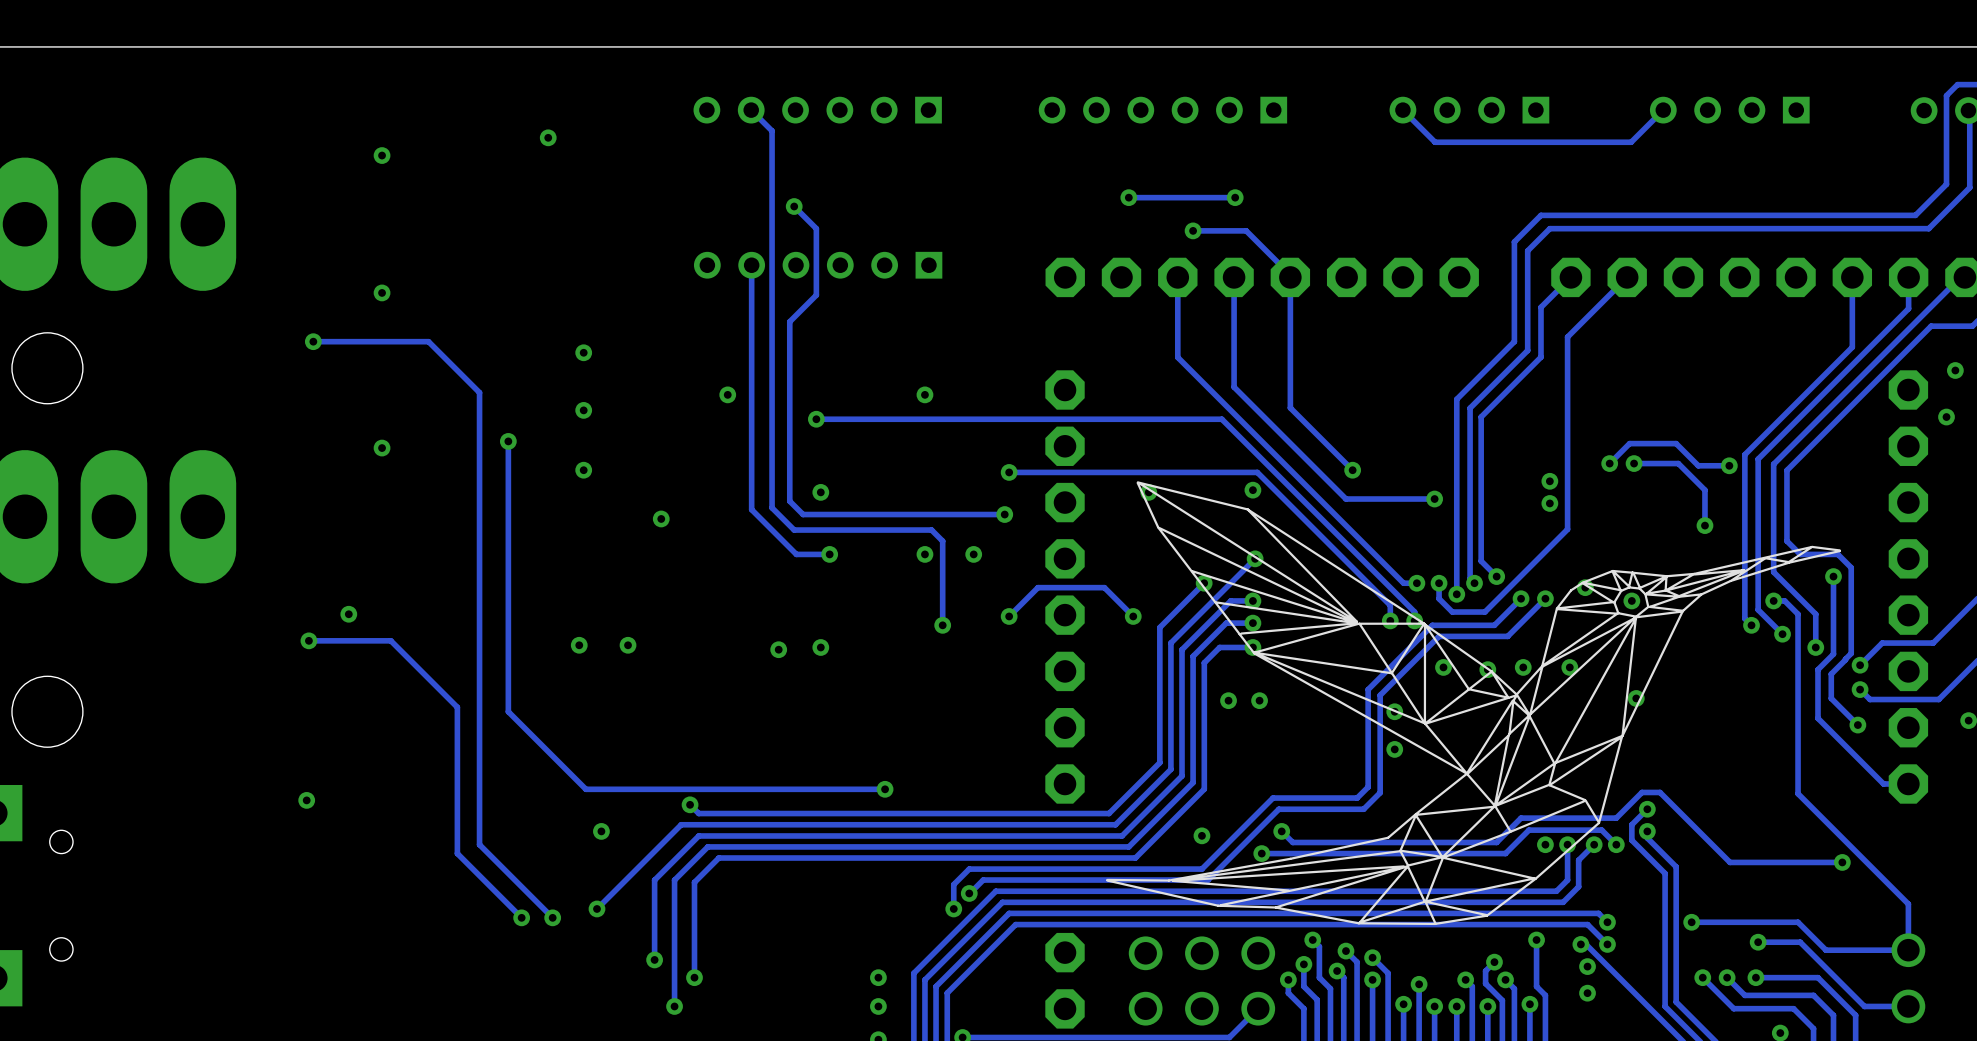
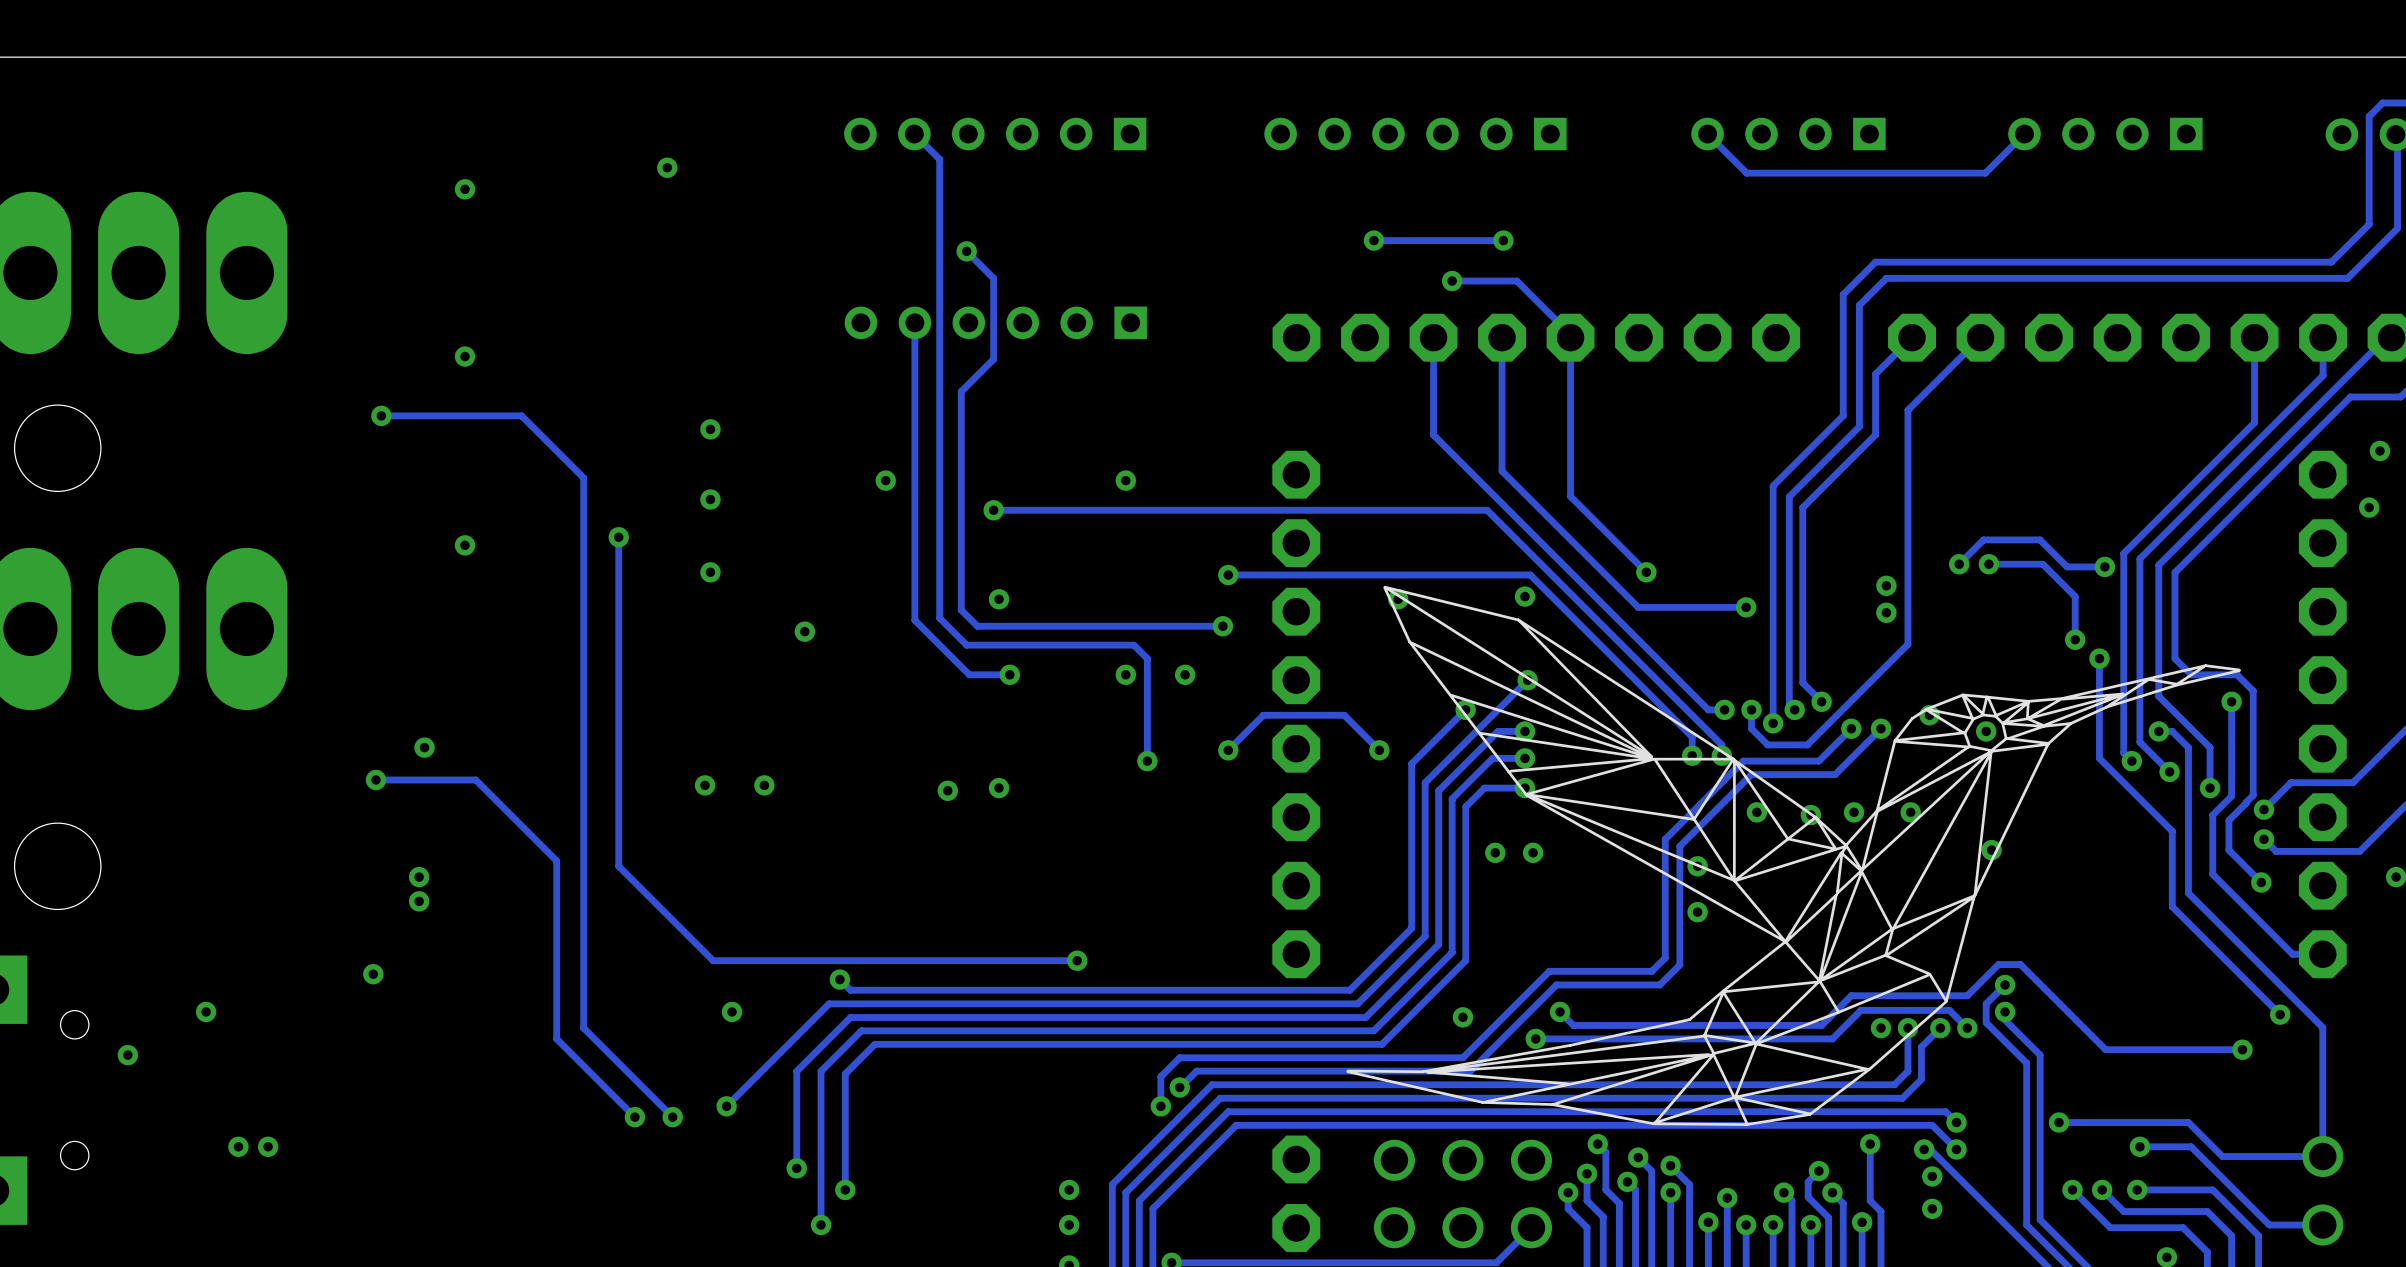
track: none -> (2099, 658) (2099, 758) (2172, 831) (2172, 906) (2280, 1014)
via: none -> (2099, 658)
via: none -> (419, 877)
track: (1798, 733) (1798, 793) (1908, 904) -> (2188, 893) (2322, 1027) (2322, 1100)
via: none -> (419, 901)
via: none -> (206, 1011)
via: none -> (2280, 1014)
via: none -> (127, 1055)
via: none -> (238, 1146)
via: none -> (268, 1146)

